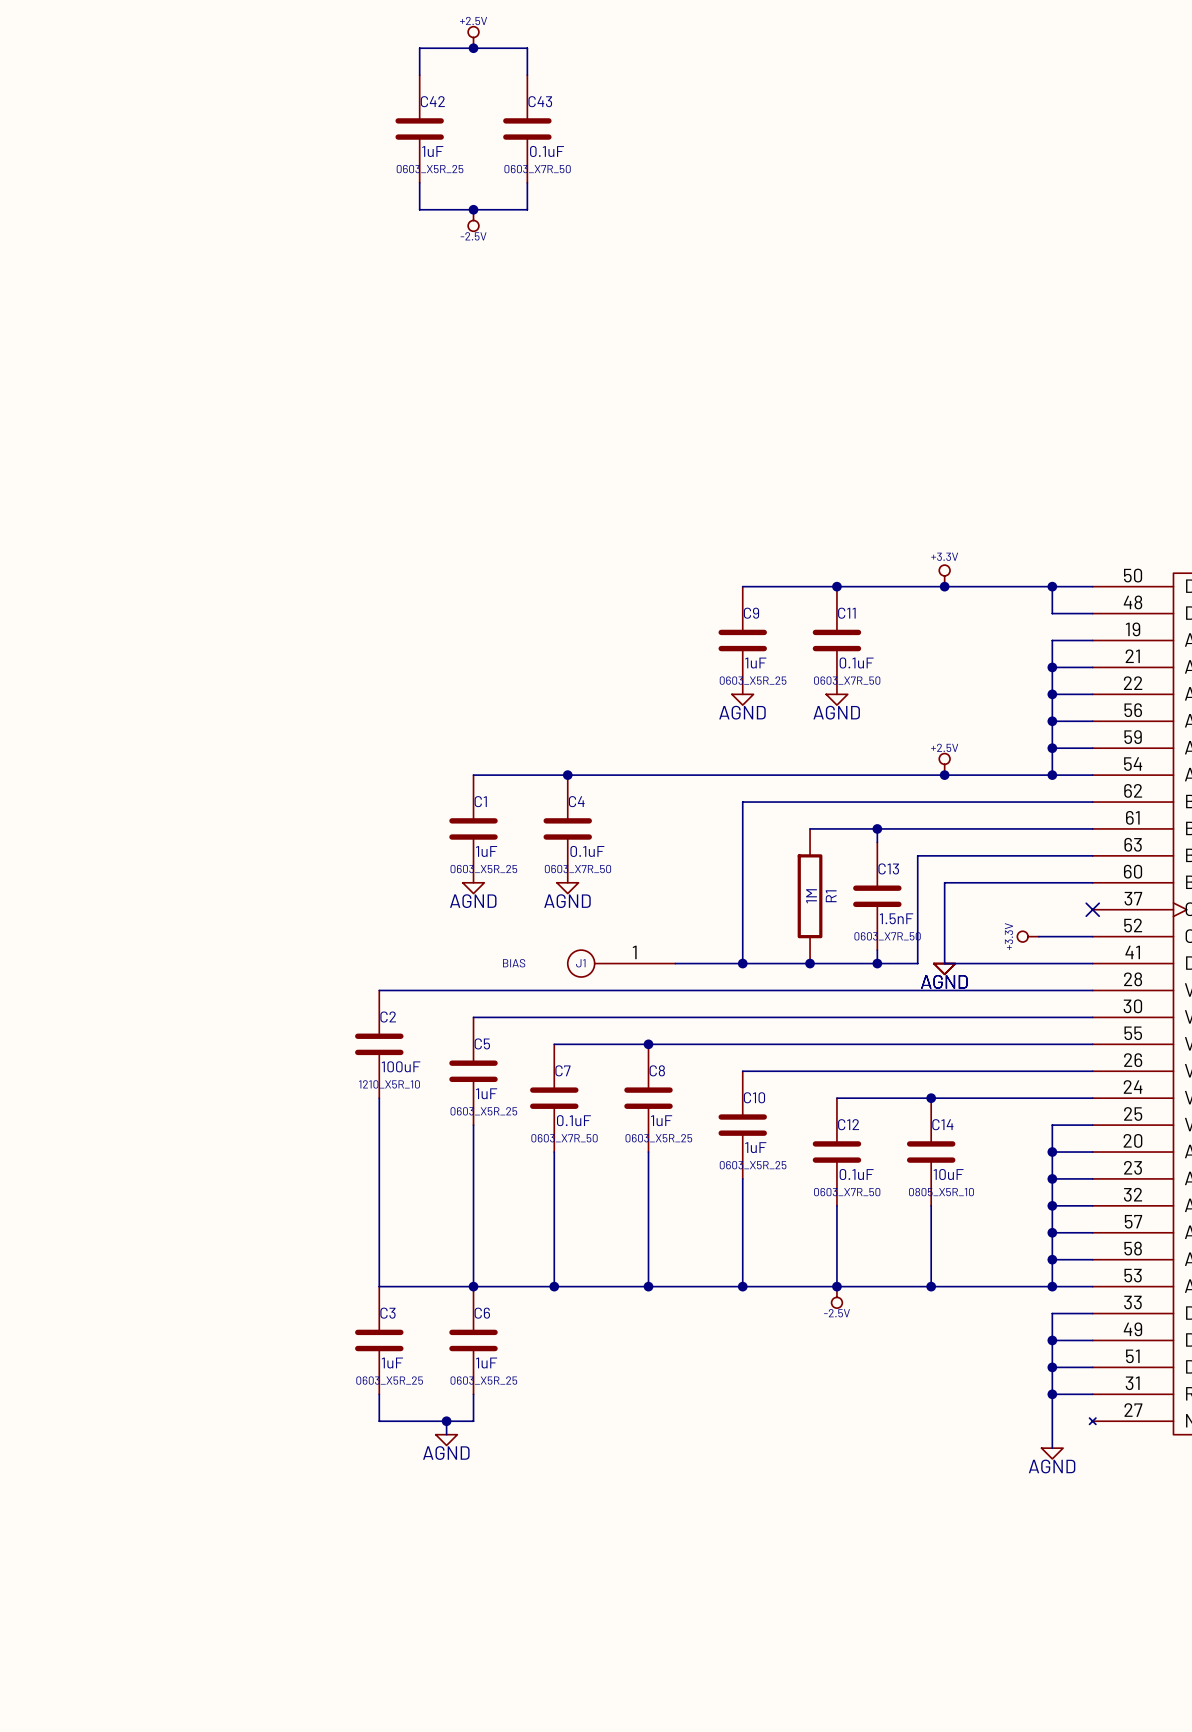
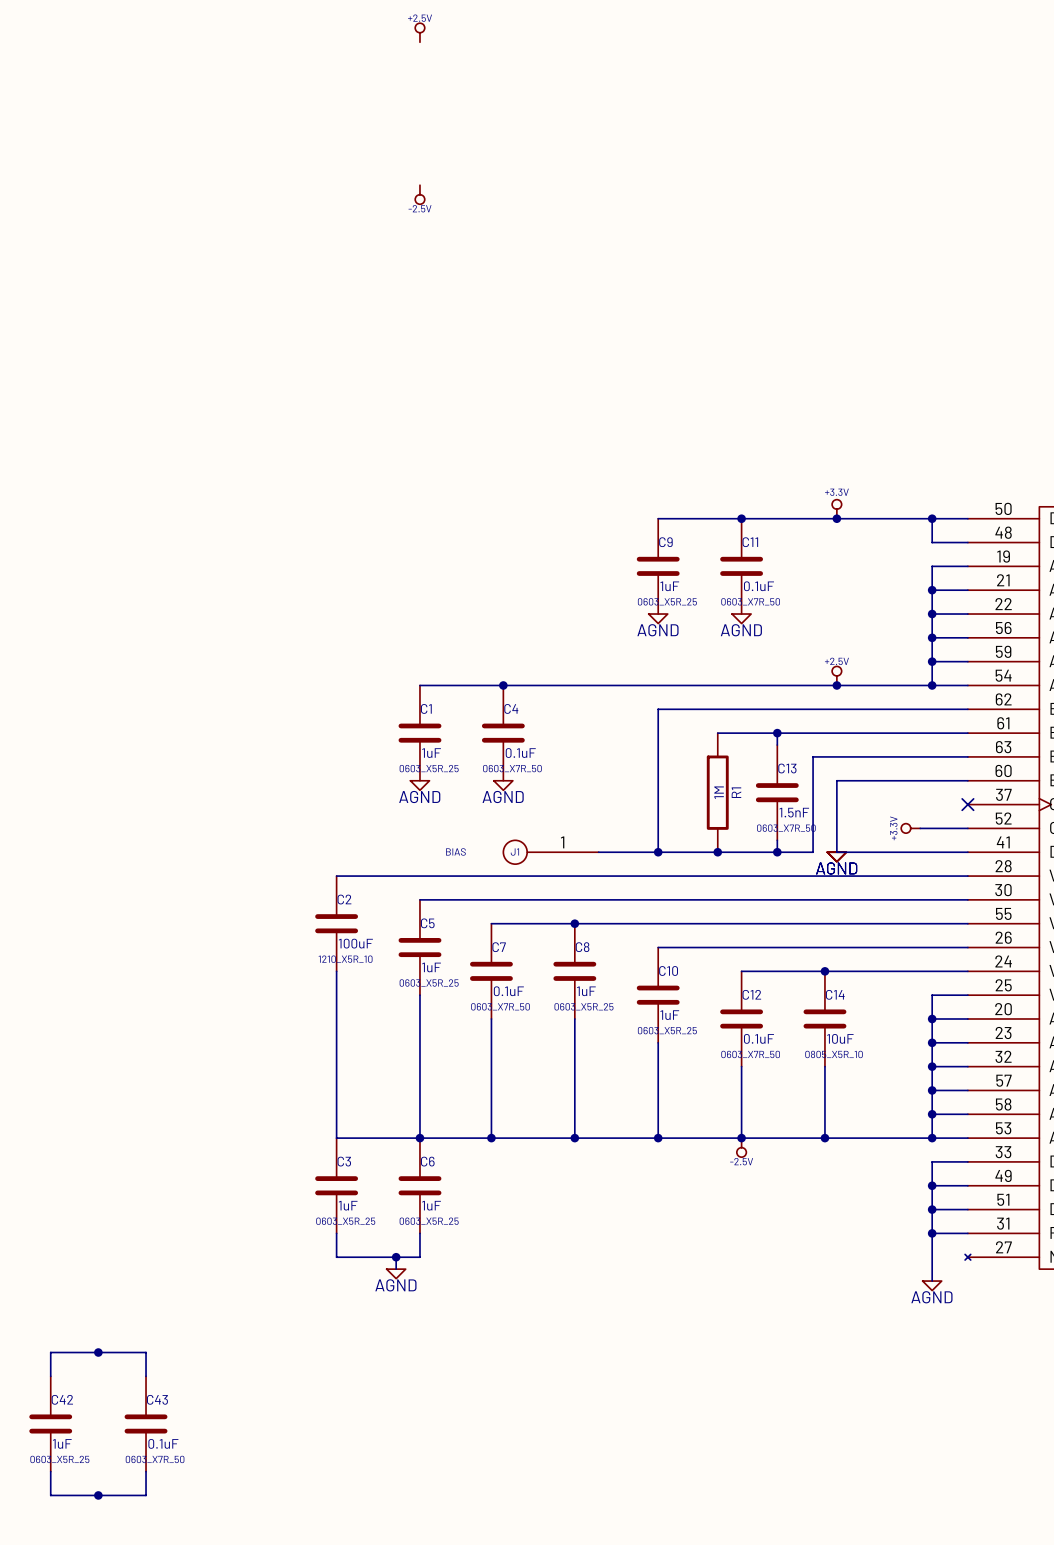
junction: (473, 48) -> none
wire: (419, 75) (419, 48) (527, 48) (527, 75) -> none
C42 position: (419, 128) -> (50, 1423)
C43 position: (527, 128) -> (146, 1423)
wire: (419, 182) (419, 209) (527, 209) (527, 182) -> none
junction: (473, 209) -> none
junction: none -> (98, 1352)
wire: none -> (50, 1376) (50, 1352) (146, 1352) (146, 1376)
wire: none -> (50, 1471) (50, 1495) (146, 1495) (146, 1471)
junction: none -> (98, 1495)

